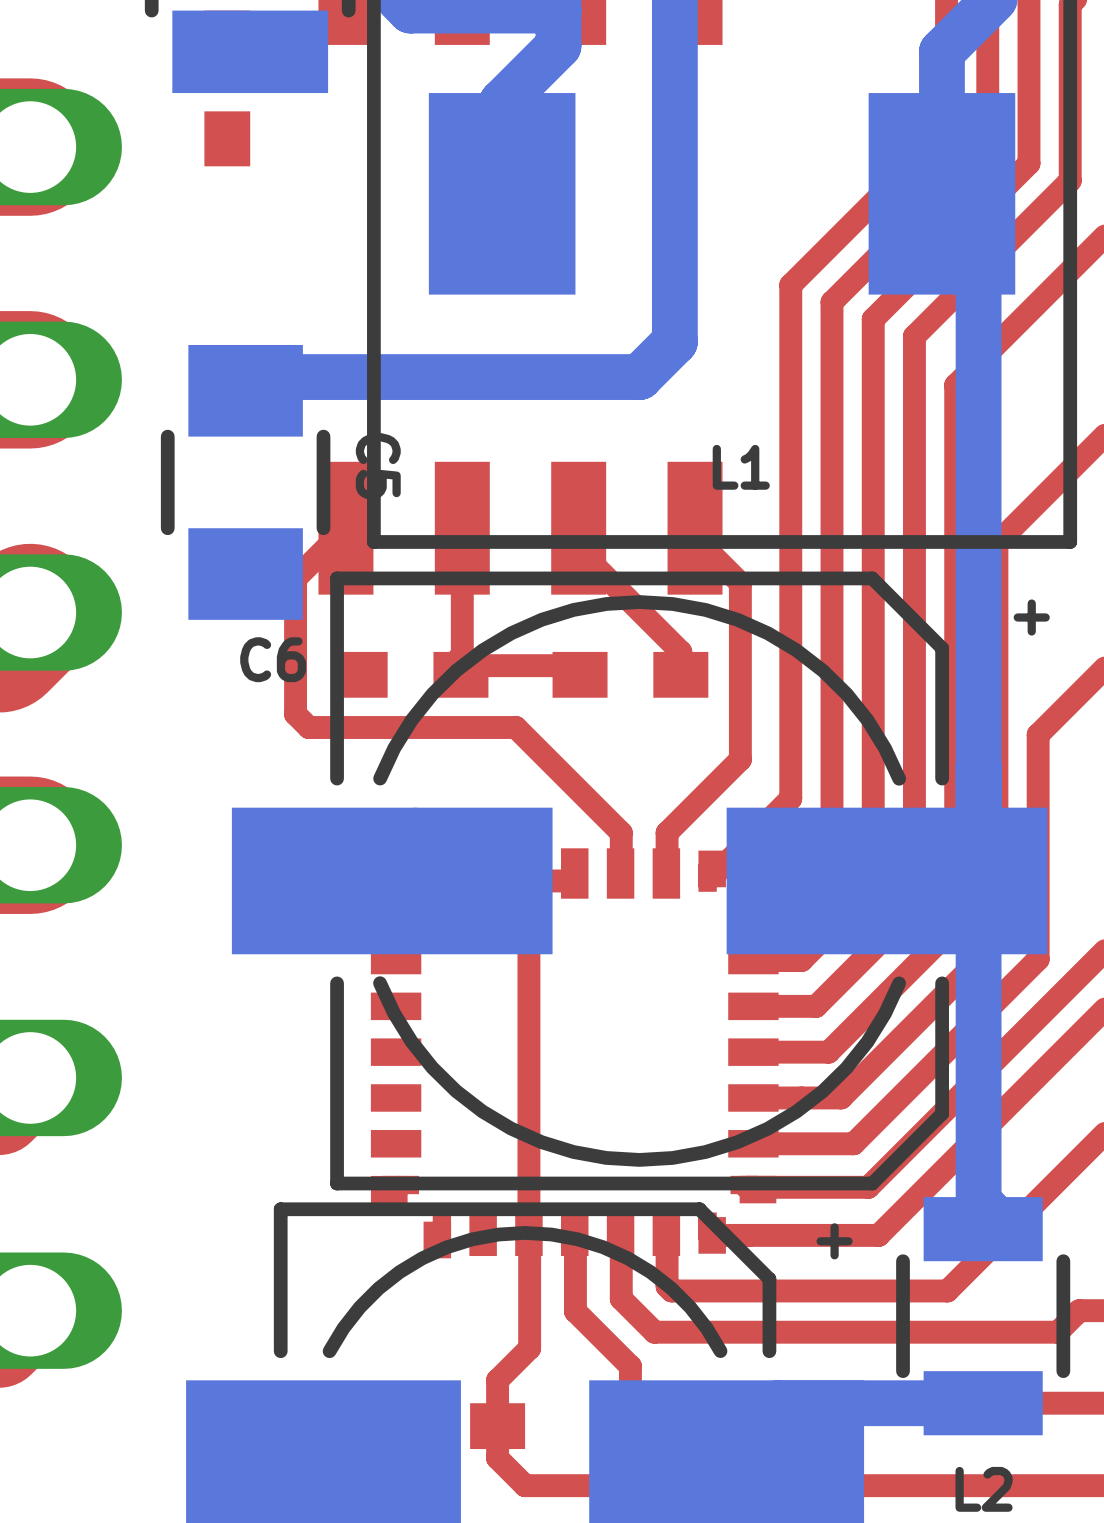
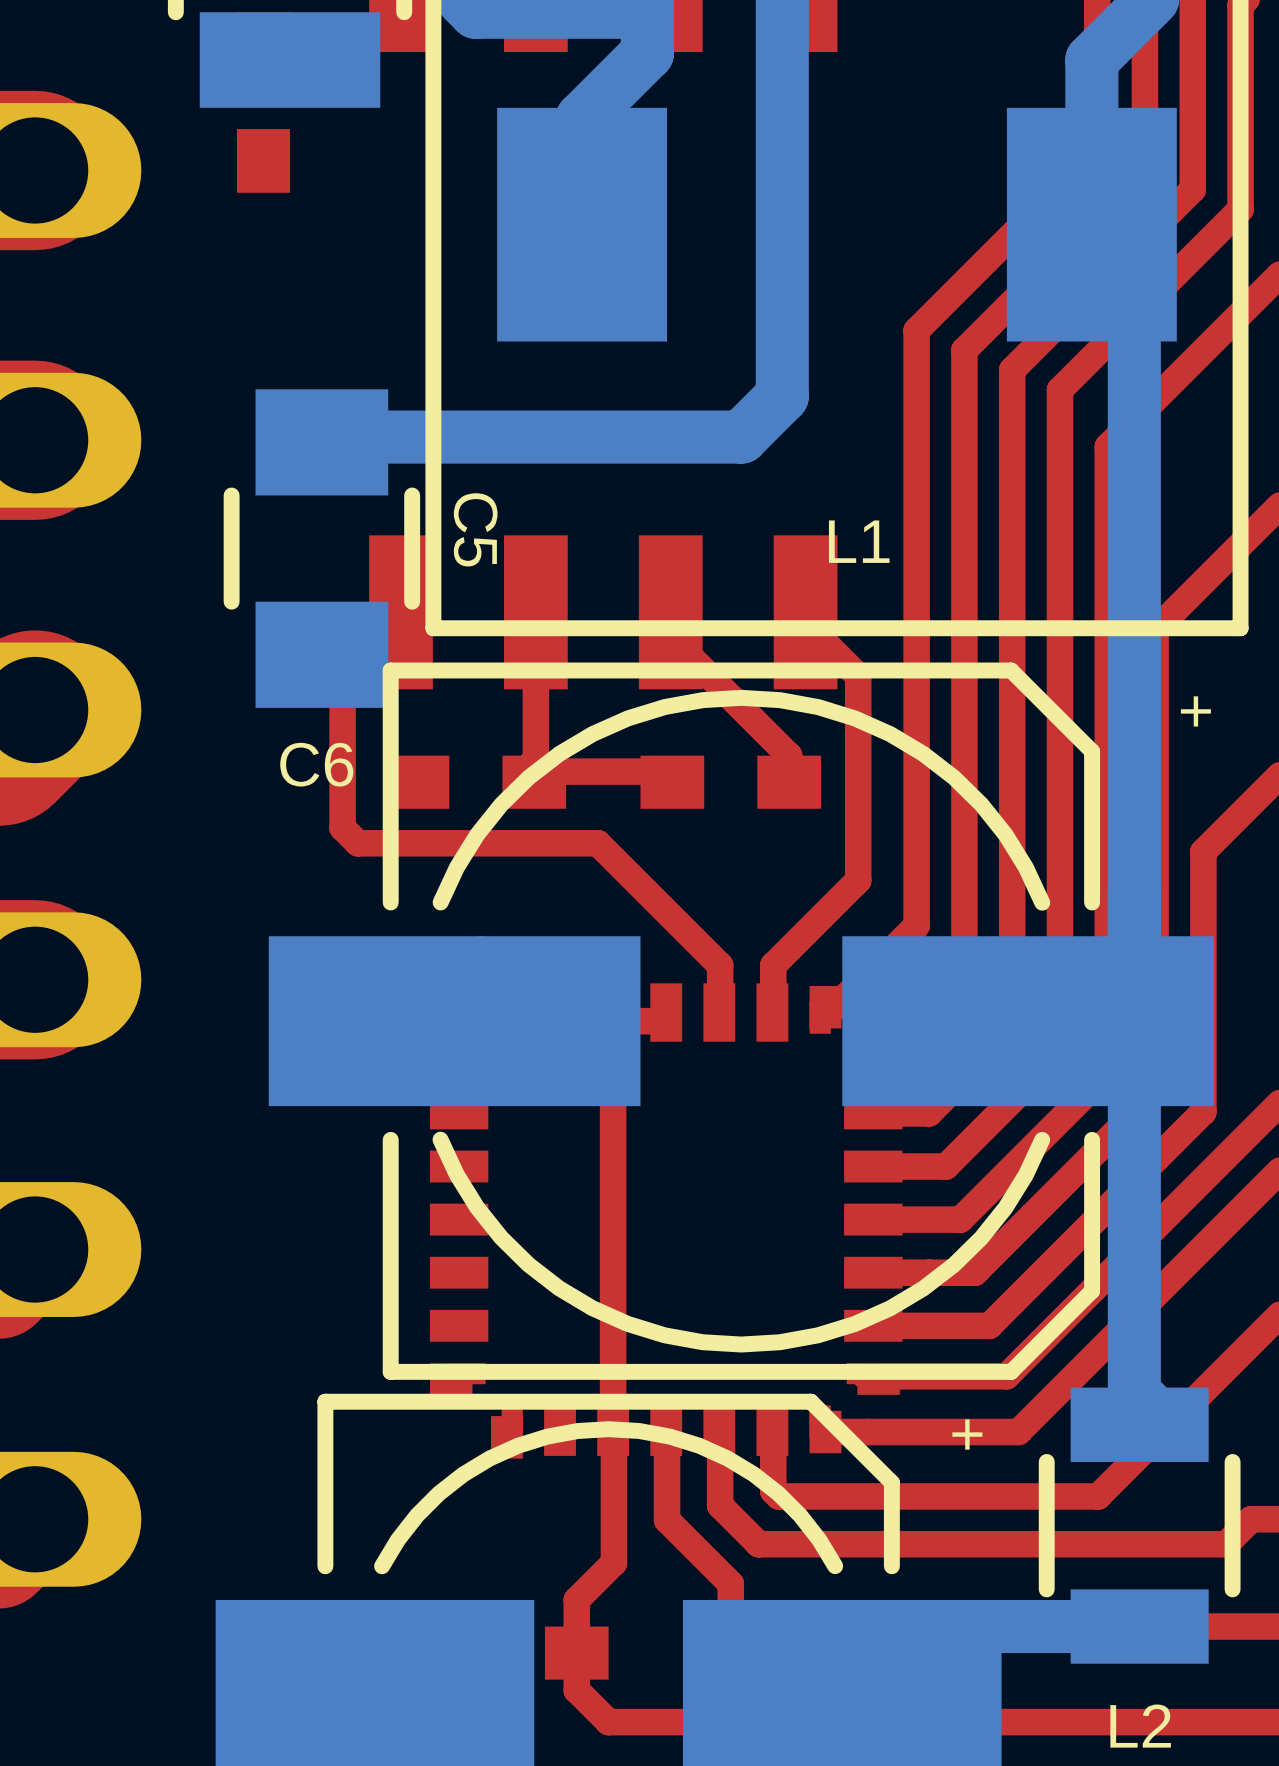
C5 position: (245, 482) -> (321, 548)

